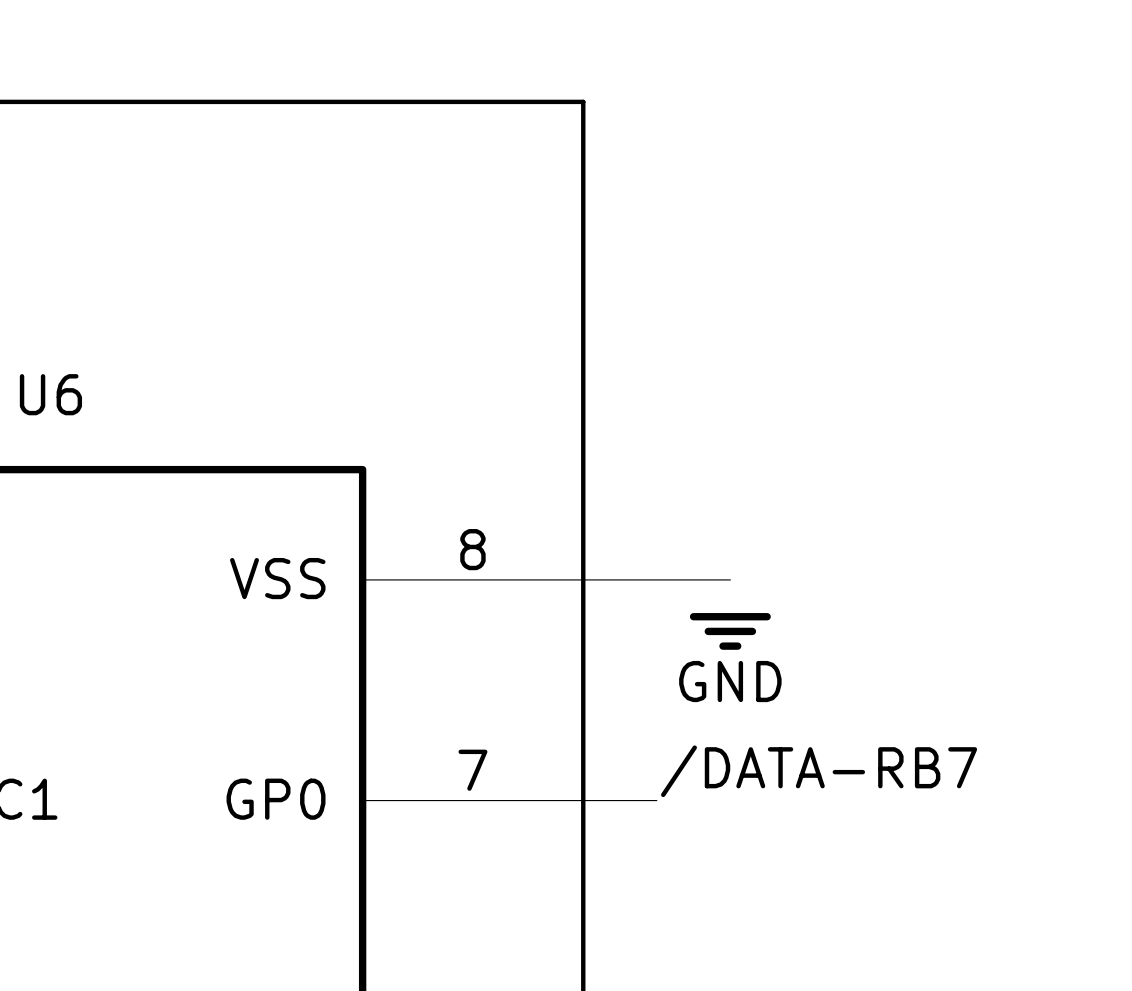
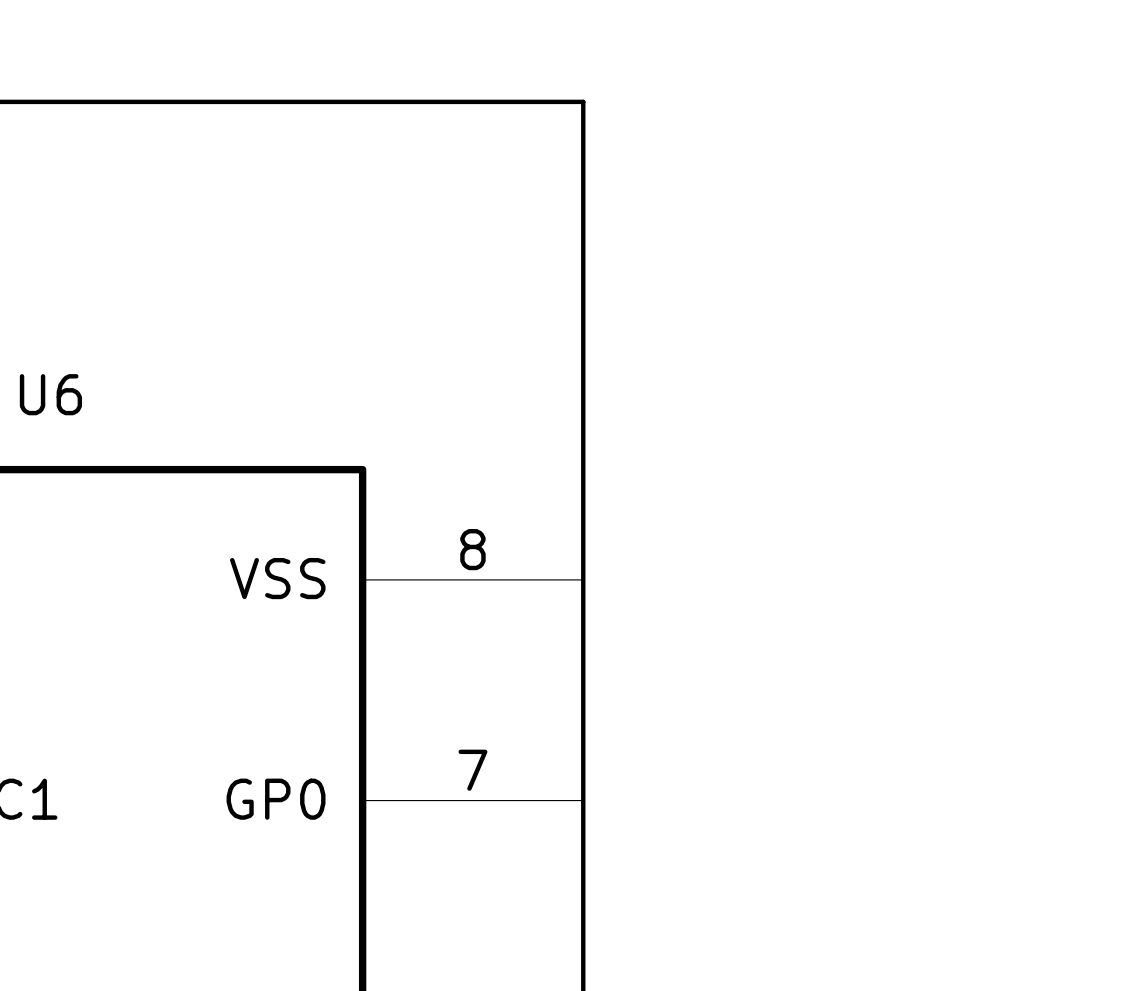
wire: (583, 579) (730, 579) -> none
power symbol: GND (730, 631) -> none
label: /DATA-RB7 (819, 771) -> none
wire: (583, 800) (656, 800) -> none

